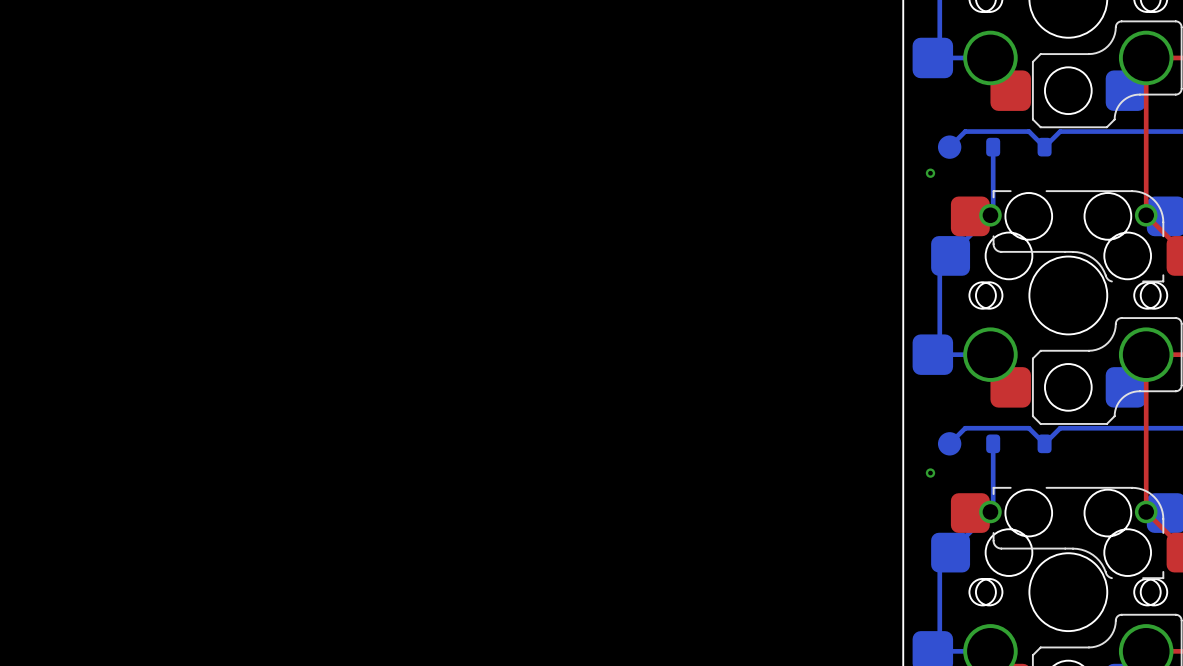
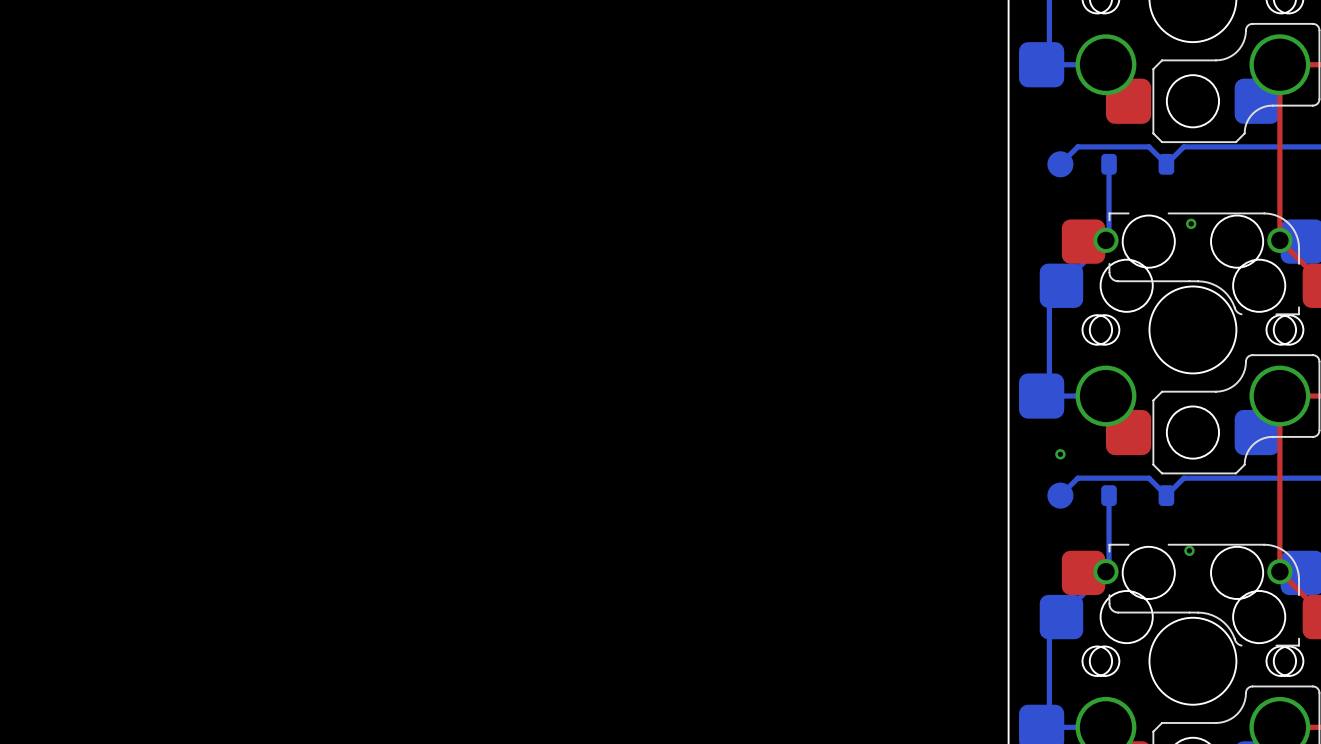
via: (930, 173) -> none
via: none -> (1191, 223)
via: none -> (1060, 454)
via: (930, 473) -> none
via: none -> (1189, 550)

